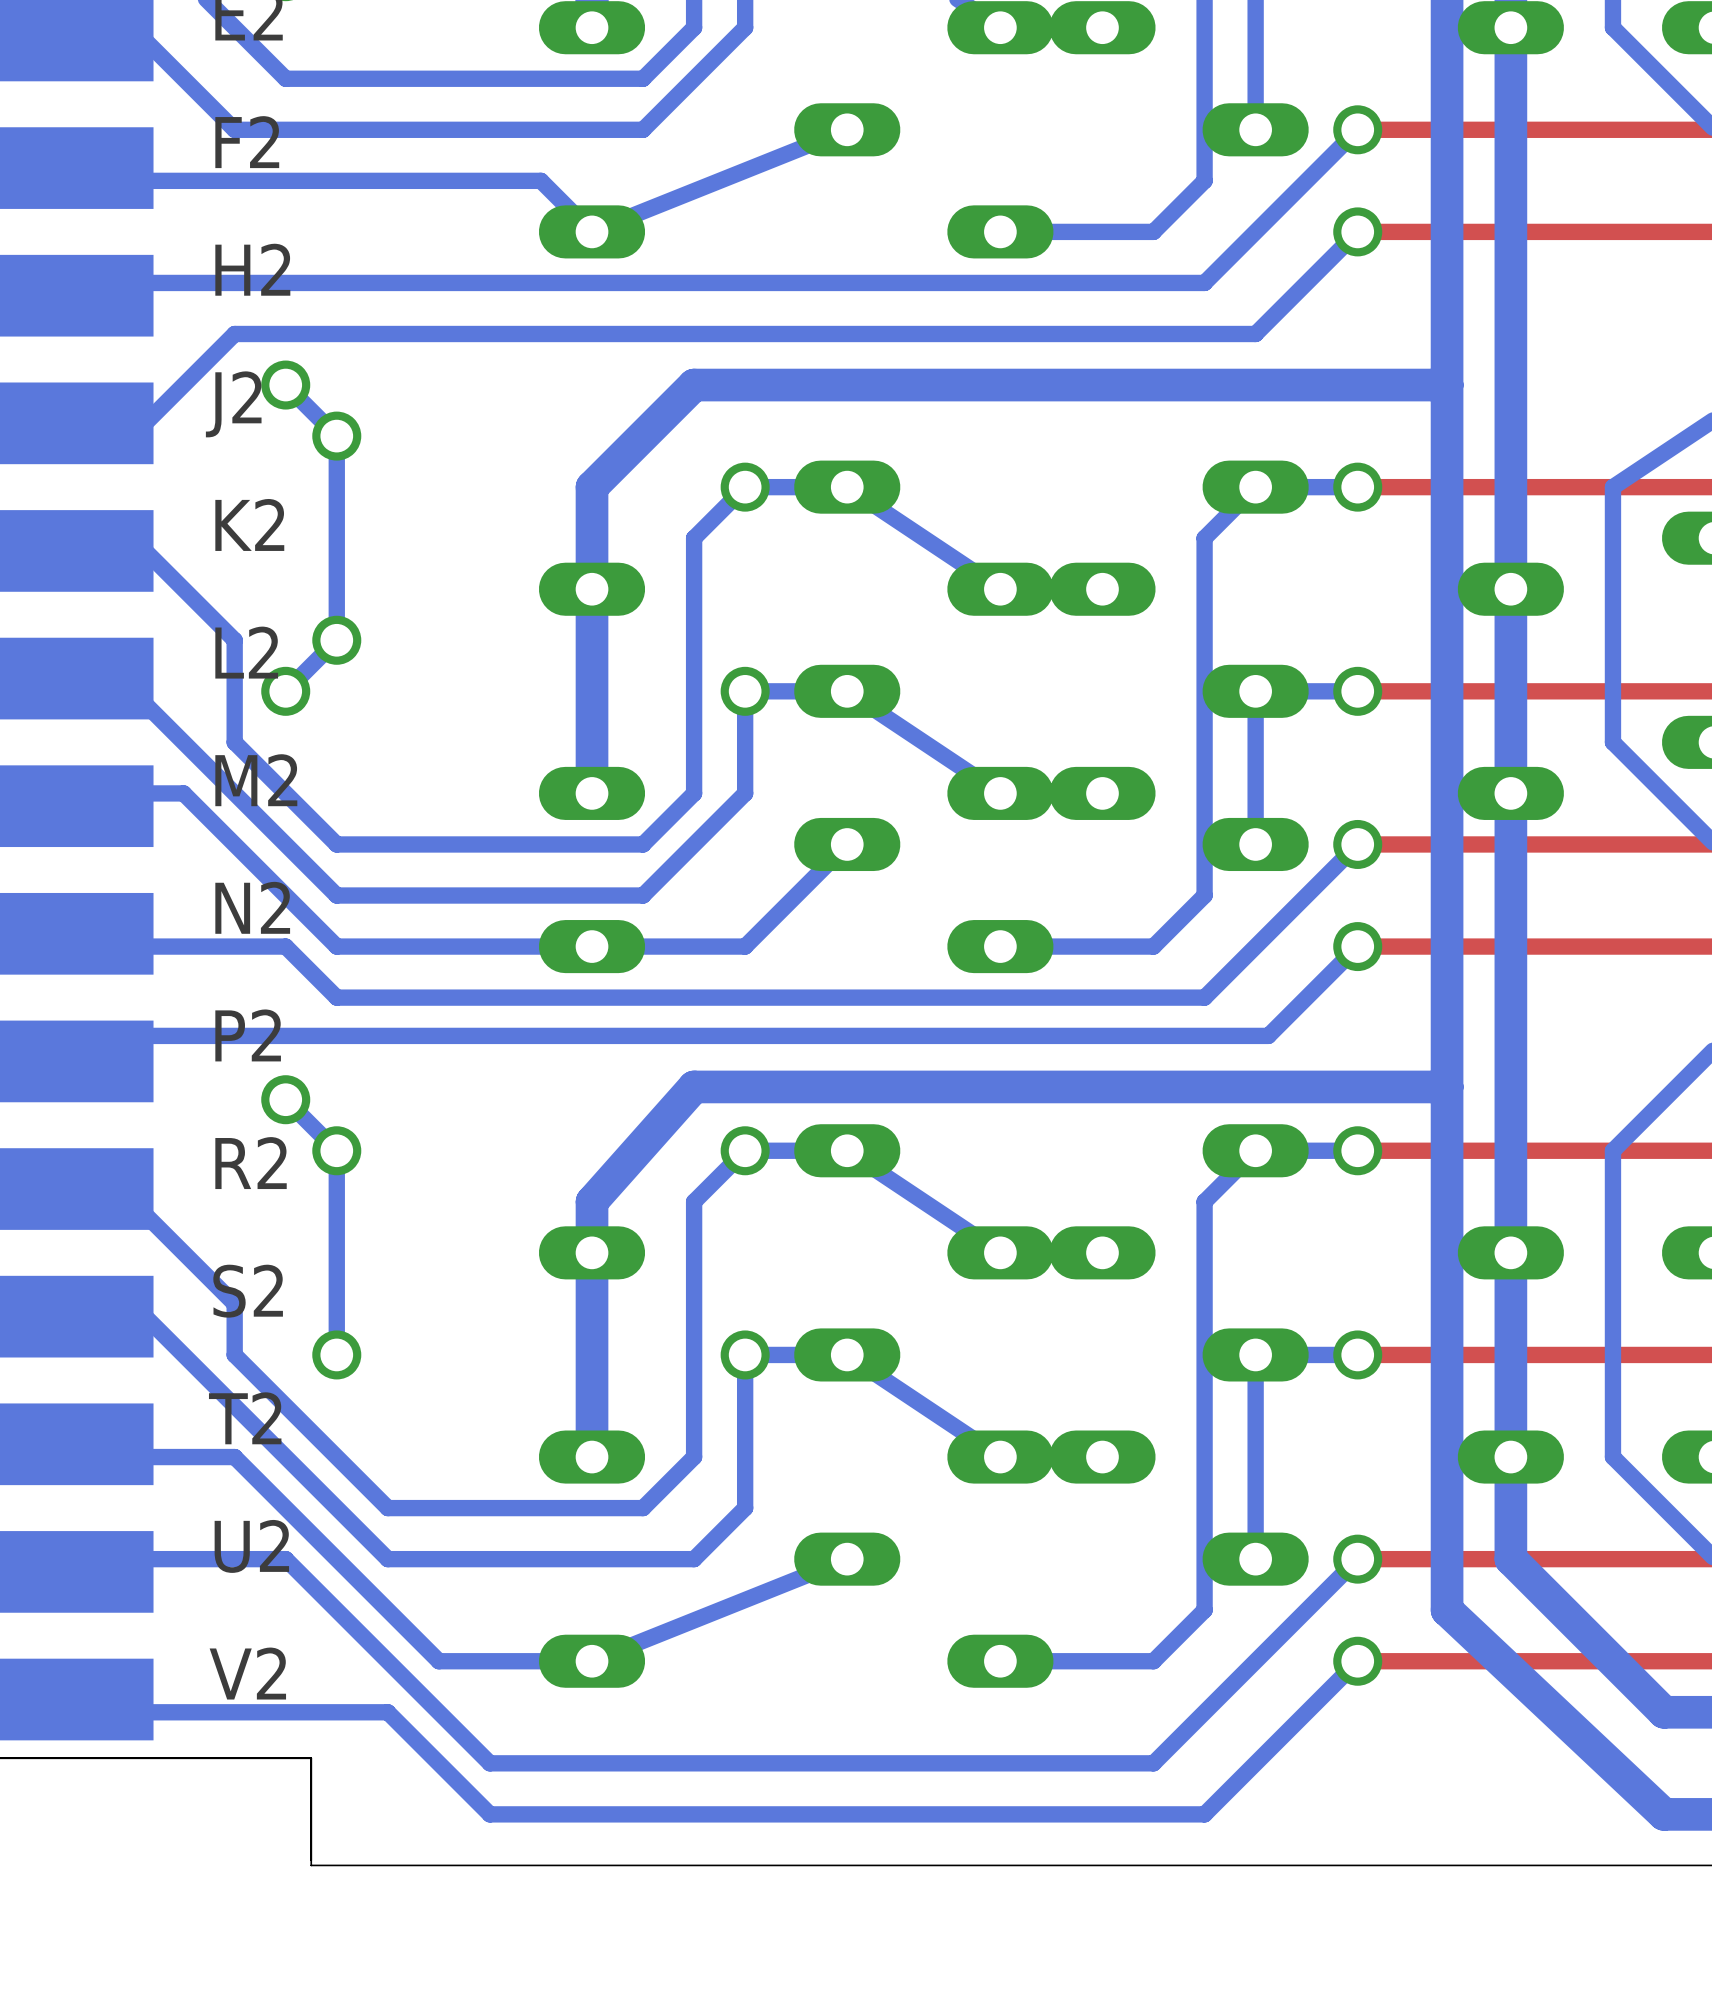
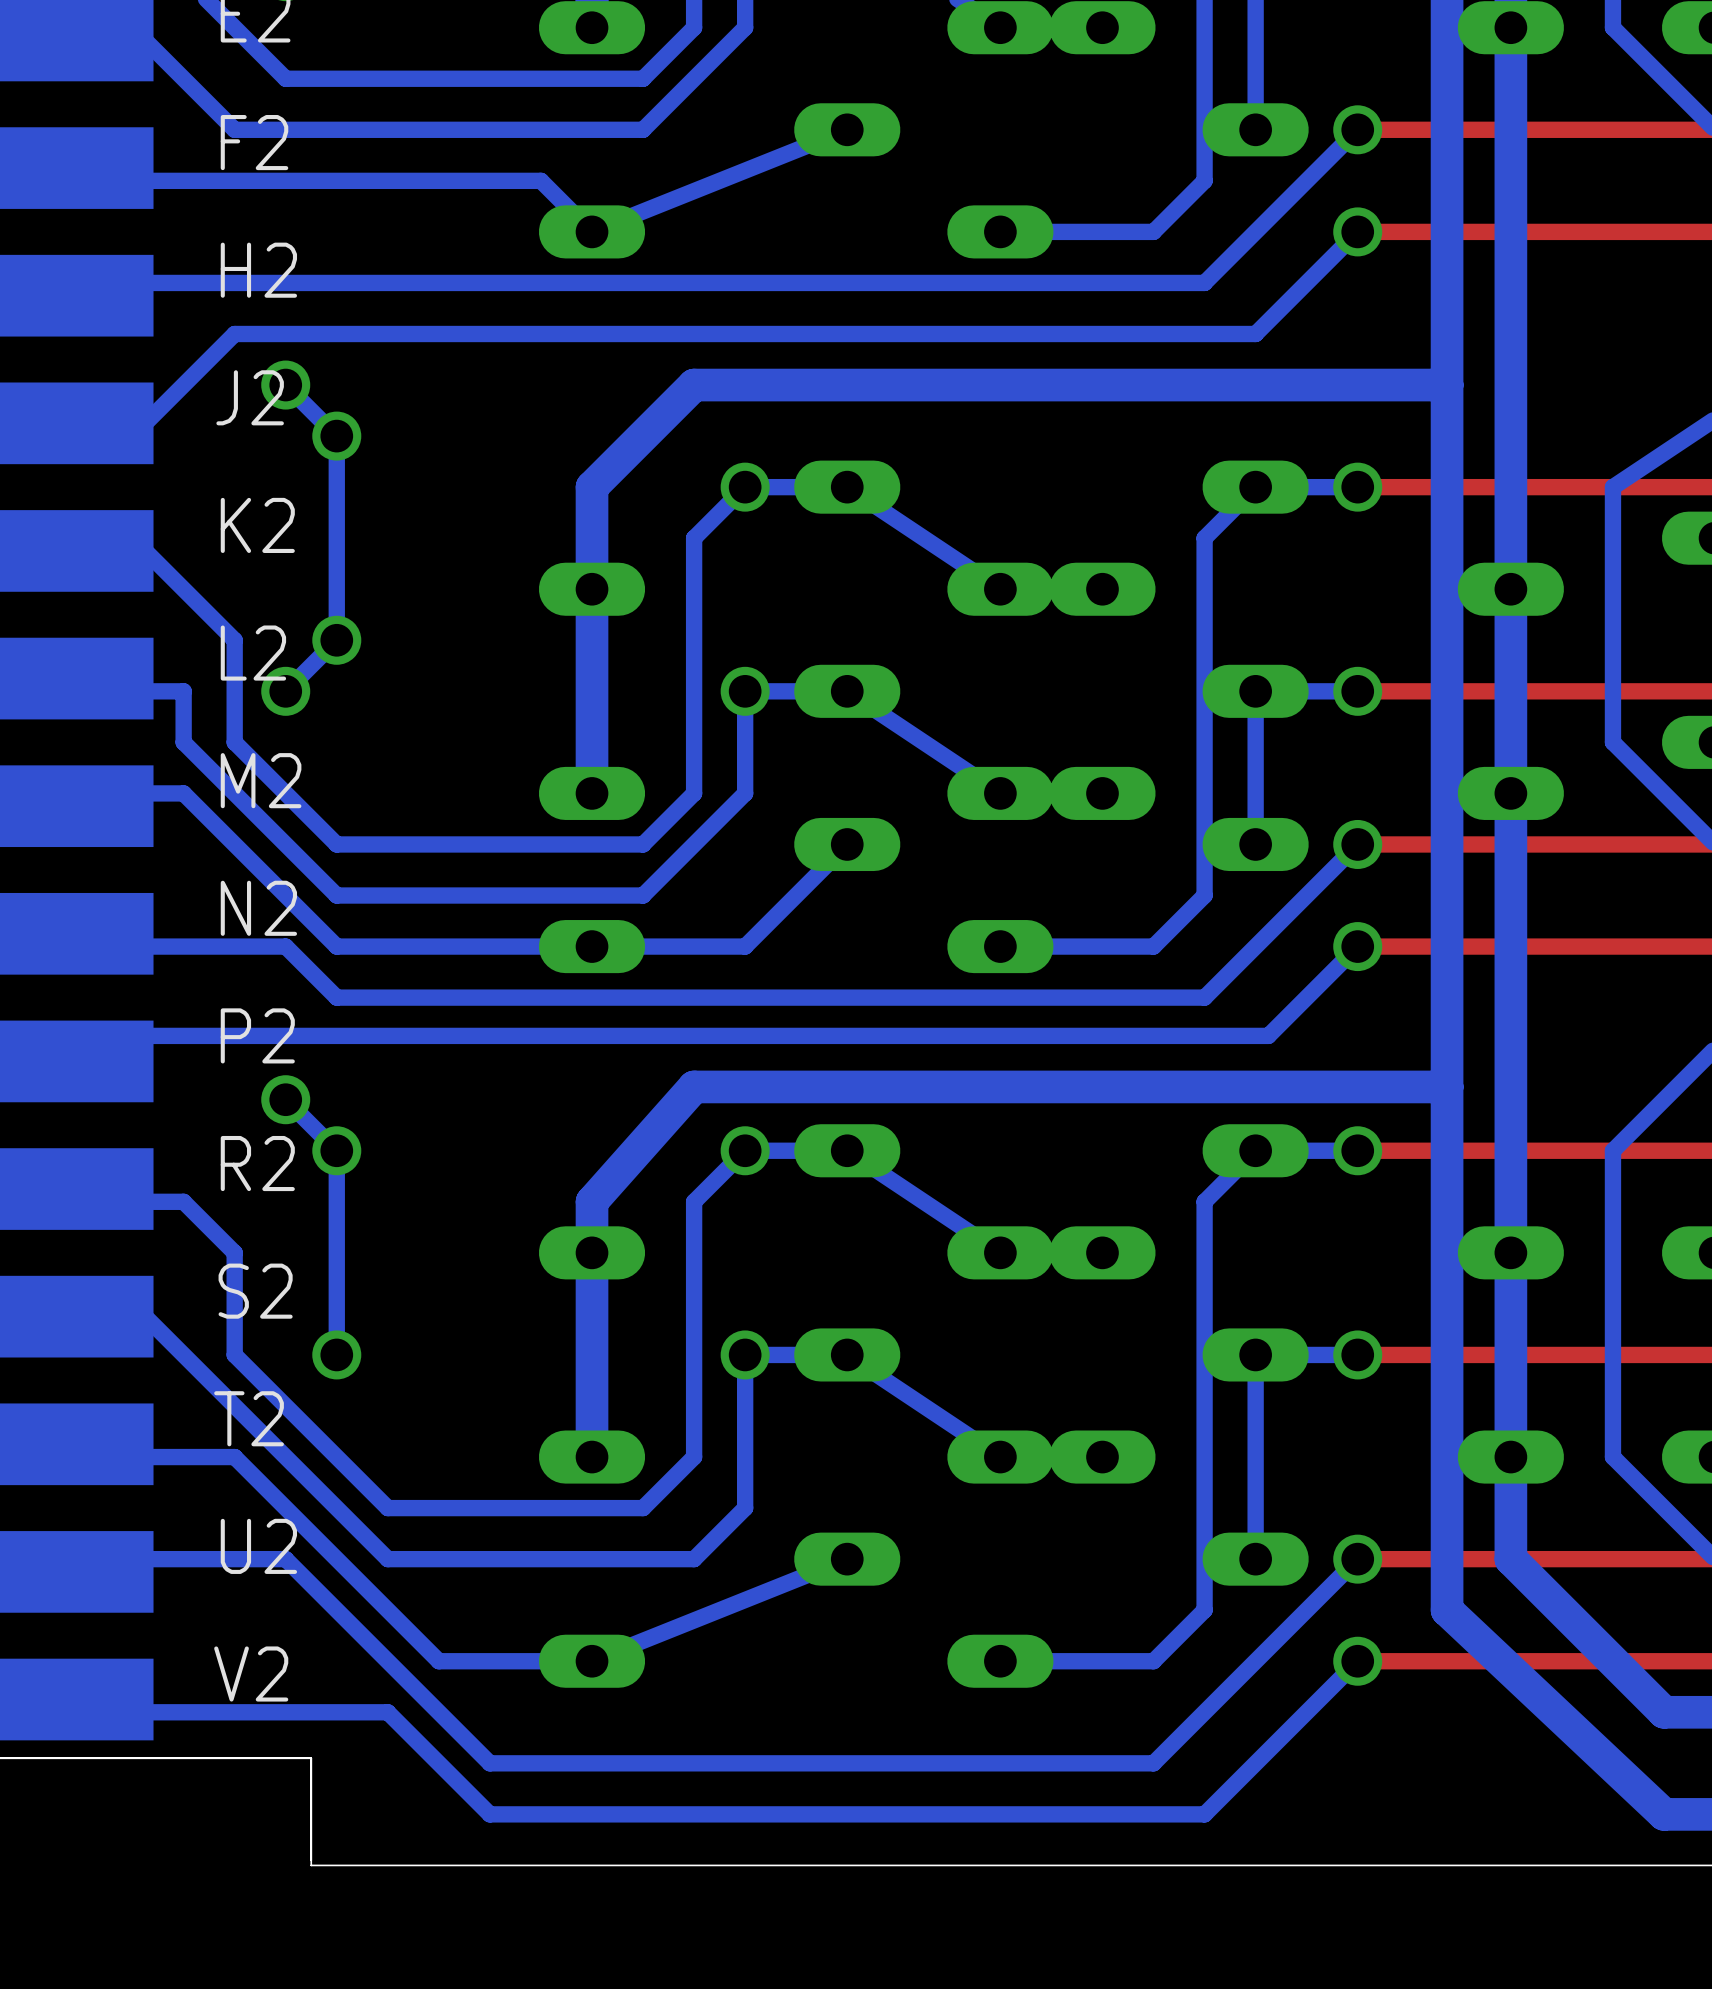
bottom track: (132, 691) (183, 742) -> (132, 691) (183, 691) (183, 742)
bottom track: (132, 1201) (234, 1303) -> (132, 1201) (183, 1201) (234, 1252) (234, 1303)

